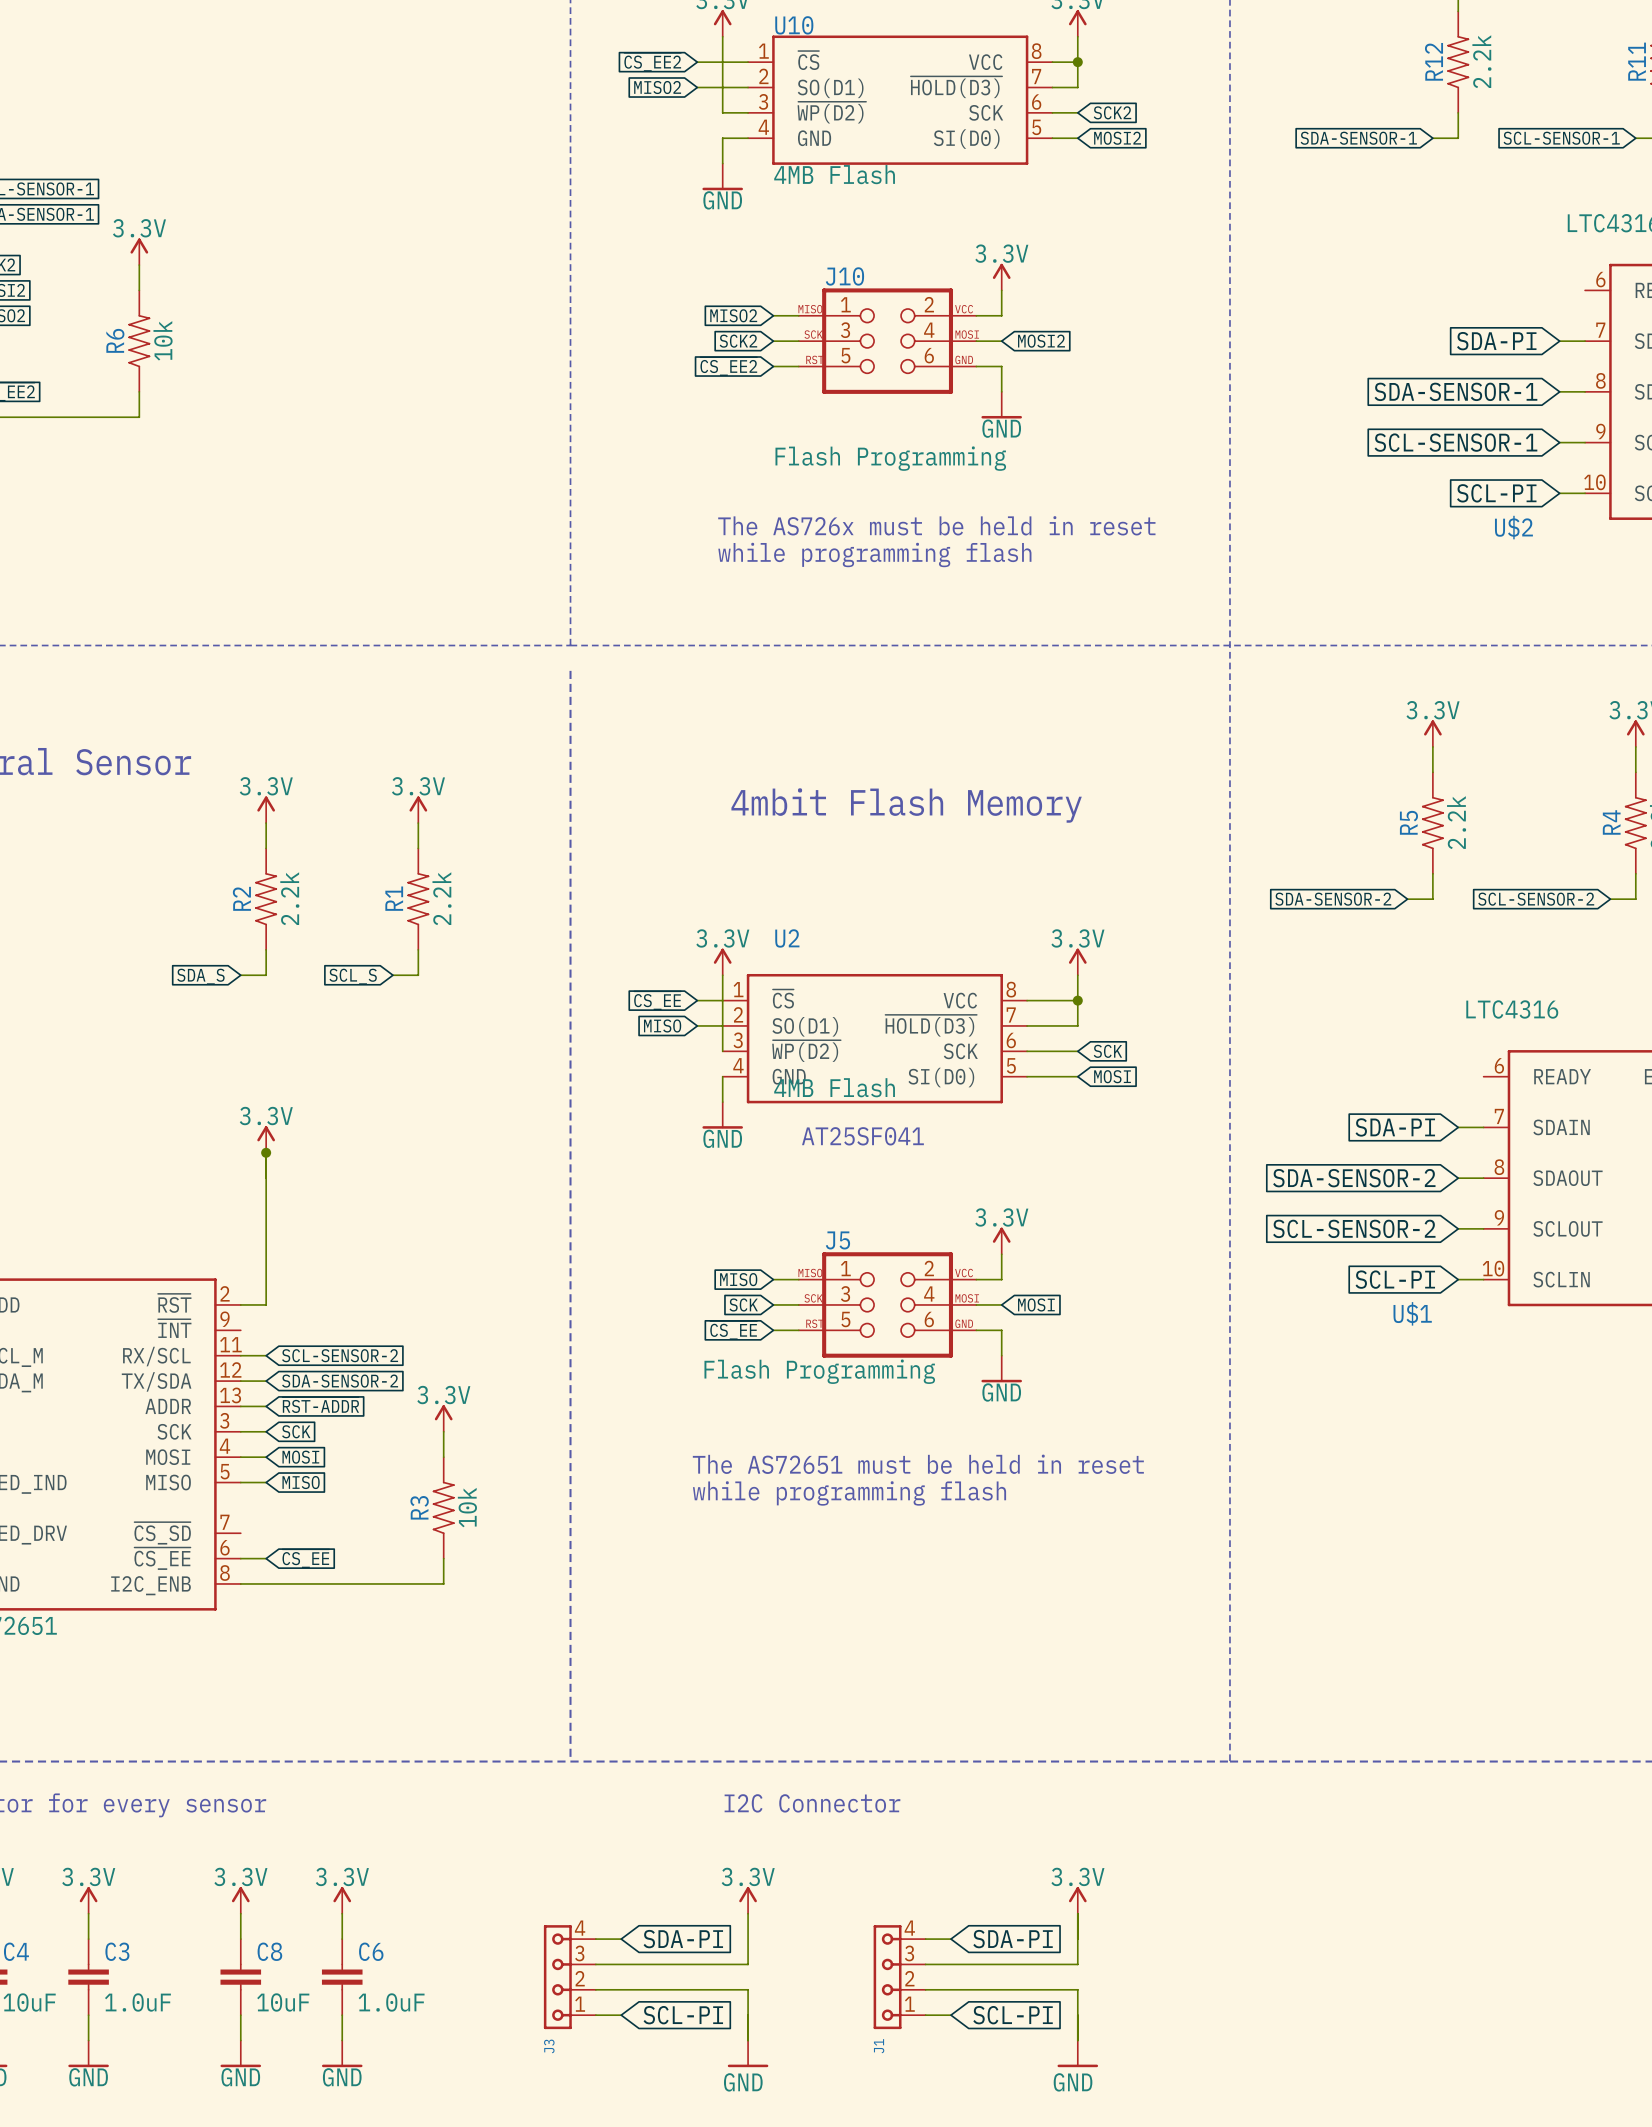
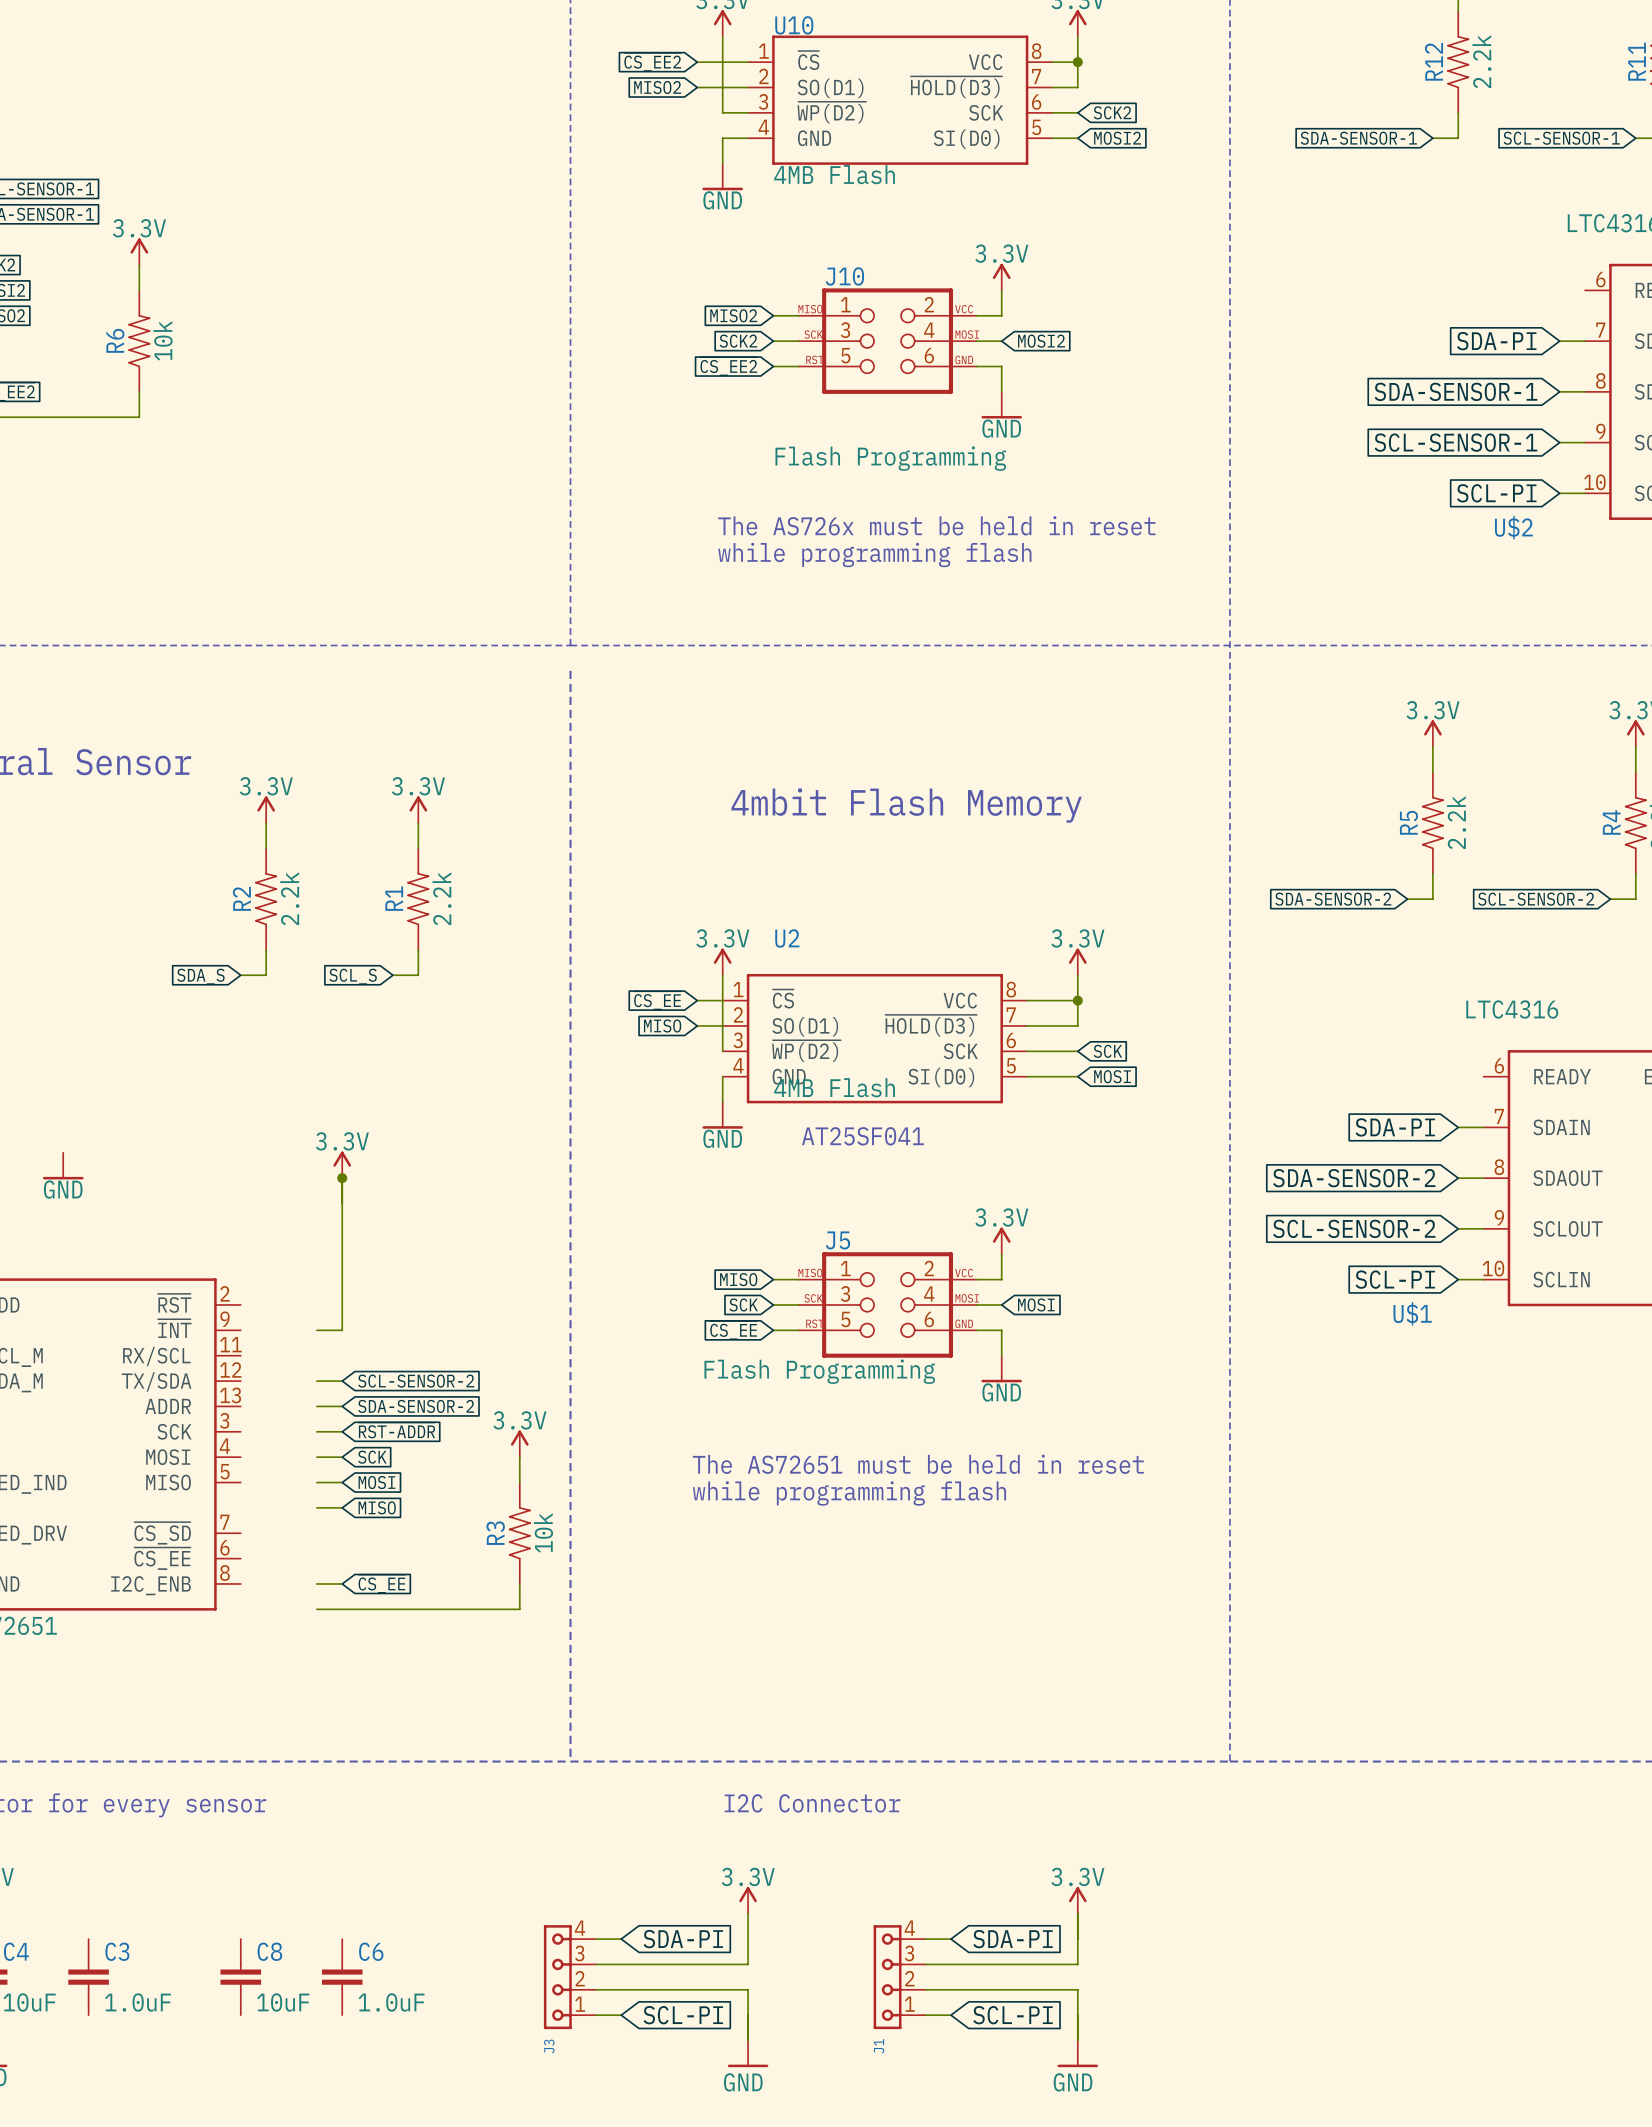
power symbol position: 3.3V (266, 1139) -> 3.3V (342, 1164)
wire: (266, 1152) (266, 1304) (240, 1304) -> (342, 1178) (342, 1330) (316, 1330)
junction: (266, 1152) -> none
power symbol: none -> GND (63, 1166)
junction: none -> (342, 1178)
wire: (240, 1355) (266, 1355) -> (316, 1381) (342, 1381)
global label position: SCL-SENSOR-2 (340, 1355) -> SCL-SENSOR-2 (416, 1381)
wire: (240, 1381) (266, 1381) -> (316, 1406) (342, 1406)
global label position: SDA-SENSOR-2 (340, 1381) -> SDA-SENSOR-2 (416, 1406)
global label position: ~{RST-ADDR} (320, 1405) -> ~{RST-ADDR} (396, 1430)
wire: (240, 1406) (266, 1406) -> (316, 1431) (342, 1431)
power symbol position: 3.3V (443, 1418) -> 3.3V (519, 1443)
wire: (240, 1431) (266, 1431) -> (316, 1457) (342, 1457)
global label position: SCK (296, 1431) -> SCK (372, 1457)
wire: (443, 1431) (443, 1457) -> (519, 1457) (519, 1482)
wire: (240, 1457) (266, 1457) -> (316, 1482) (342, 1482)
global label position: MOSI (300, 1457) -> MOSI (376, 1482)
wire: (240, 1482) (266, 1482) -> (316, 1507) (342, 1507)
global label position: MISO (301, 1482) -> MISO (377, 1507)
R3 position: (443, 1507) -> (519, 1533)
wire: (240, 1558) (266, 1558) -> none
global label position: ~{CS_EE} (305, 1558) -> ~{CS_EE} (381, 1584)
wire: (443, 1558) (443, 1583) (342, 1583) -> none
wire: (240, 1583) (316, 1583) -> none
wire: none -> (519, 1583) (519, 1609) (316, 1609)
power symbol: 3.3V (88, 1900) -> none
power symbol: 3.3V (240, 1900) -> none
power symbol: 3.3V (342, 1900) -> none
wire: (88, 1913) (88, 1939) -> none
wire: (240, 1913) (240, 1939) -> none
wire: (342, 1913) (342, 1939) -> none
wire: (88, 2015) (88, 2040) -> none
wire: (240, 2015) (240, 2040) -> none
wire: (342, 2015) (342, 2040) -> none
power symbol: GND (88, 2053) -> none
power symbol: GND (240, 2053) -> none
power symbol: GND (342, 2053) -> none

